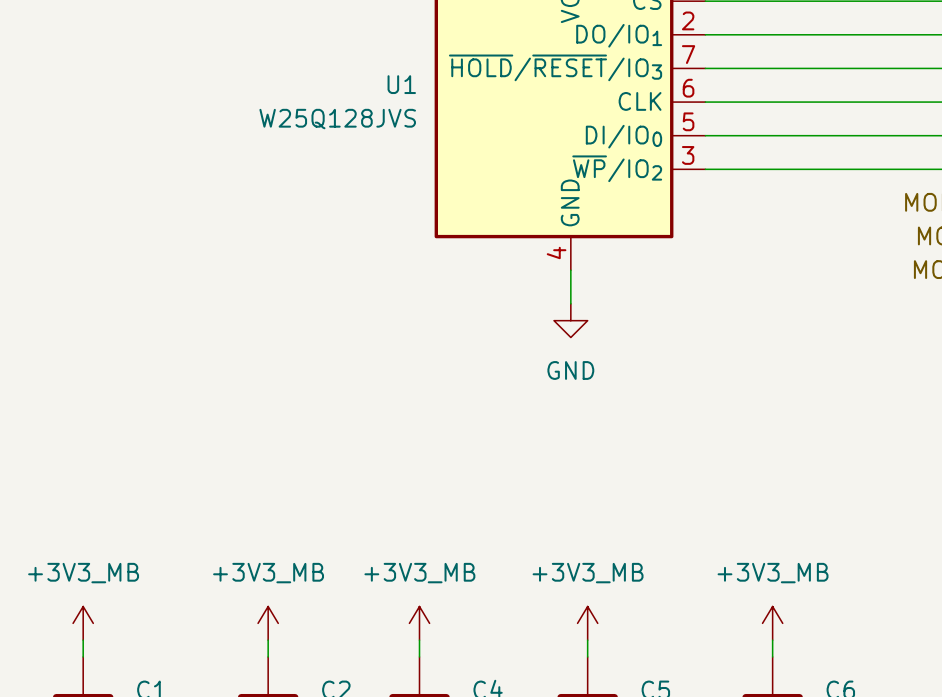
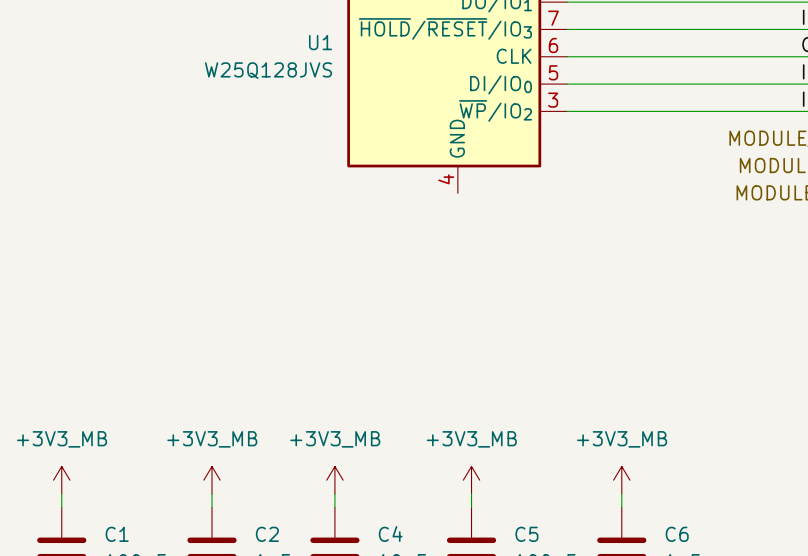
wire: (570, 270) (570, 303) -> none
power symbol: GND (570, 320) -> none

